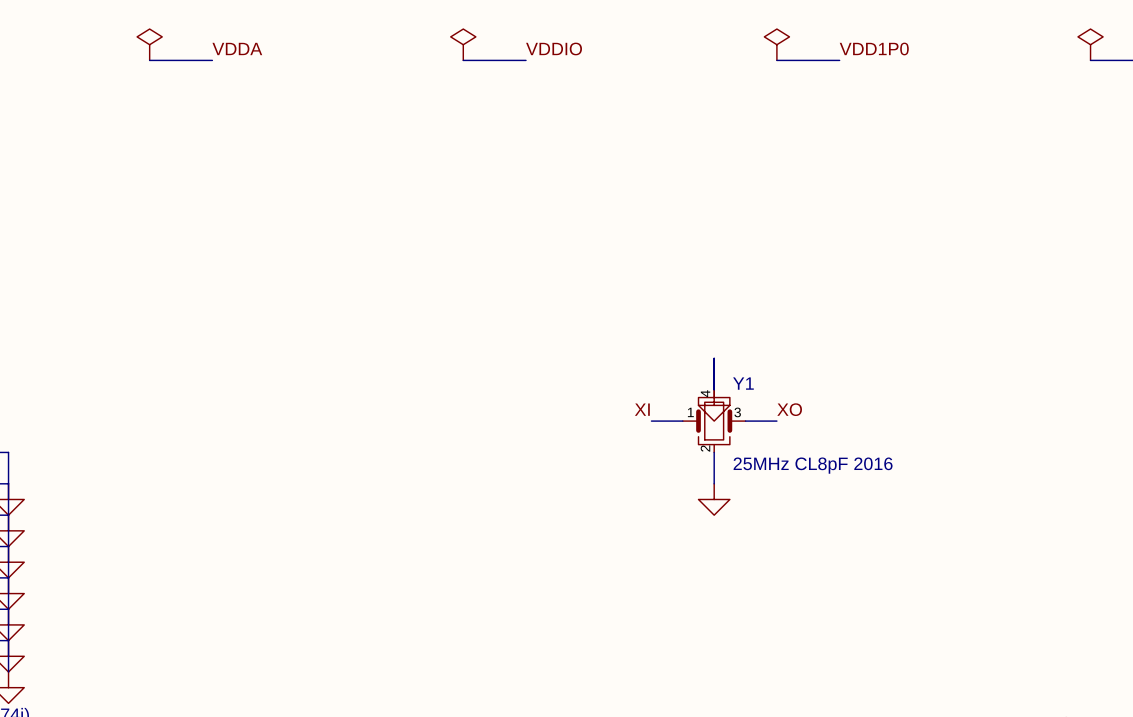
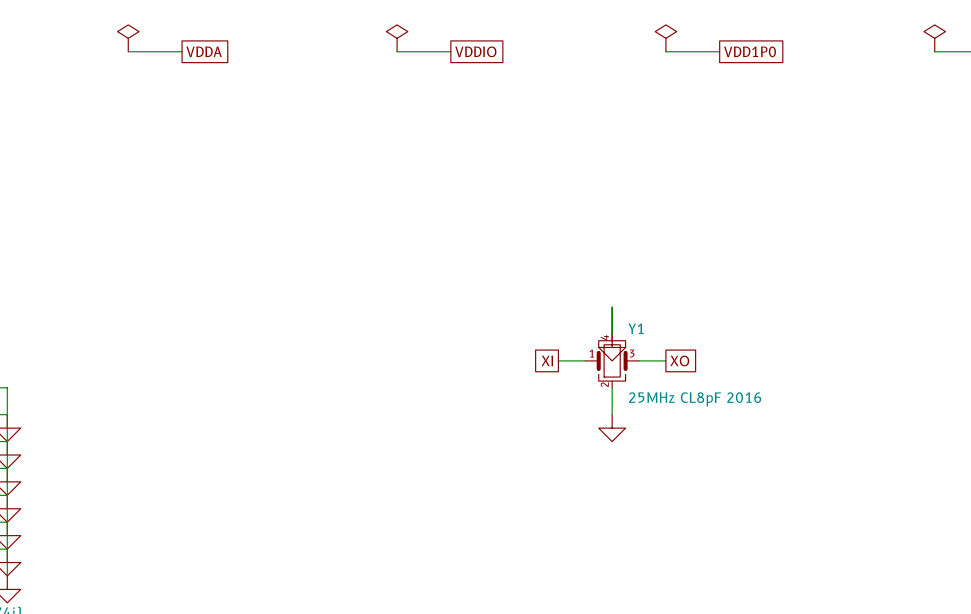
label: VDDA (237, 48) -> none
label: VDDIO (554, 48) -> none
label: VDD1P0 (874, 48) -> none
global label: none -> VDDA (204, 51)
global label: none -> VDDIO (475, 51)
global label: none -> VDD1P0 (750, 51)
label: XI (642, 409) -> none
label: XO (789, 409) -> none
global label: none -> XI (547, 360)
global label: none -> XO (679, 360)

